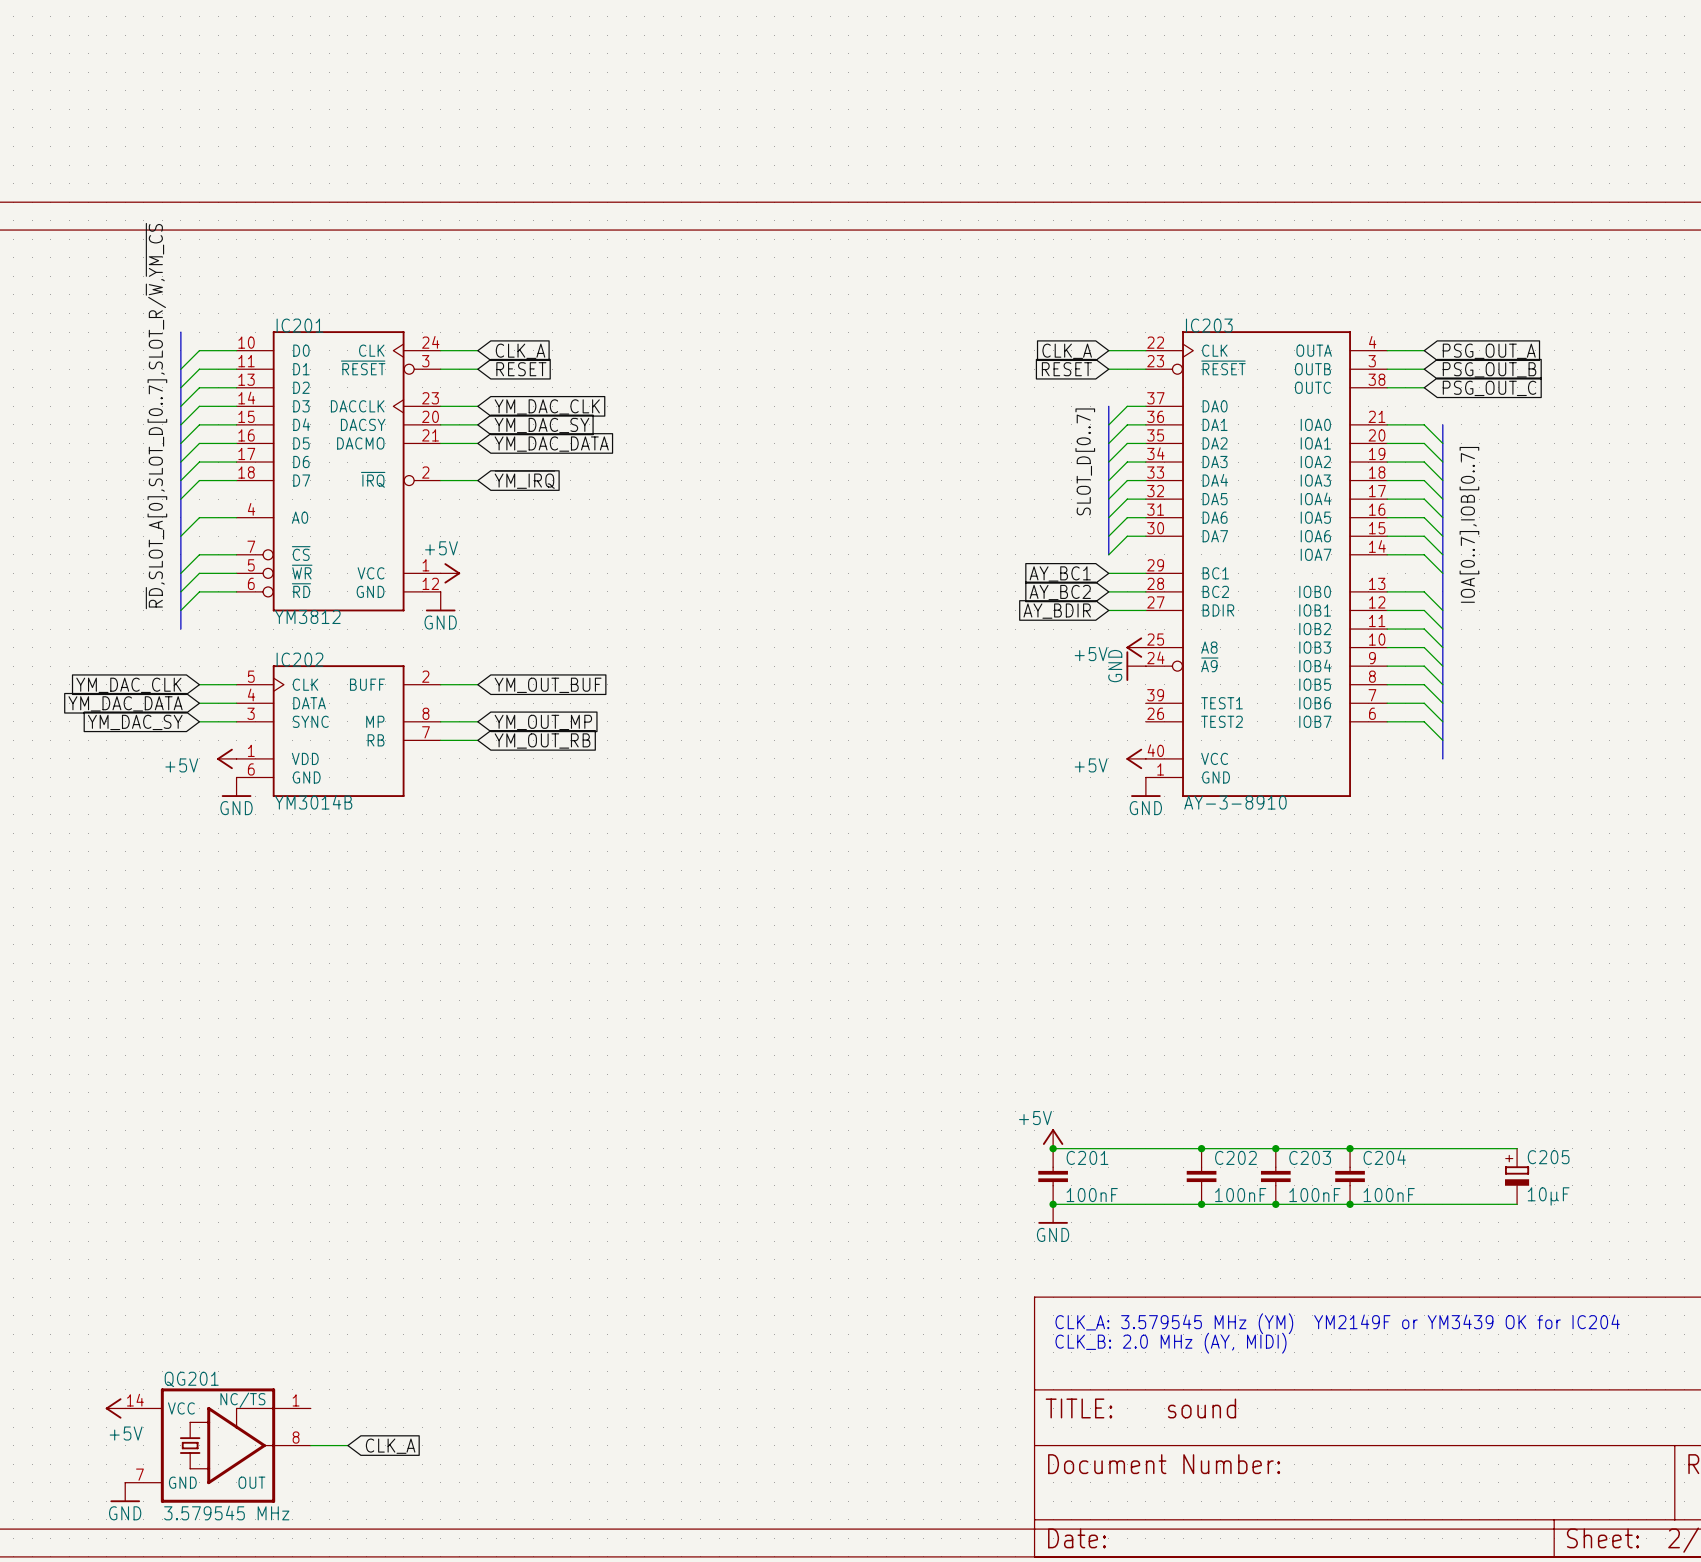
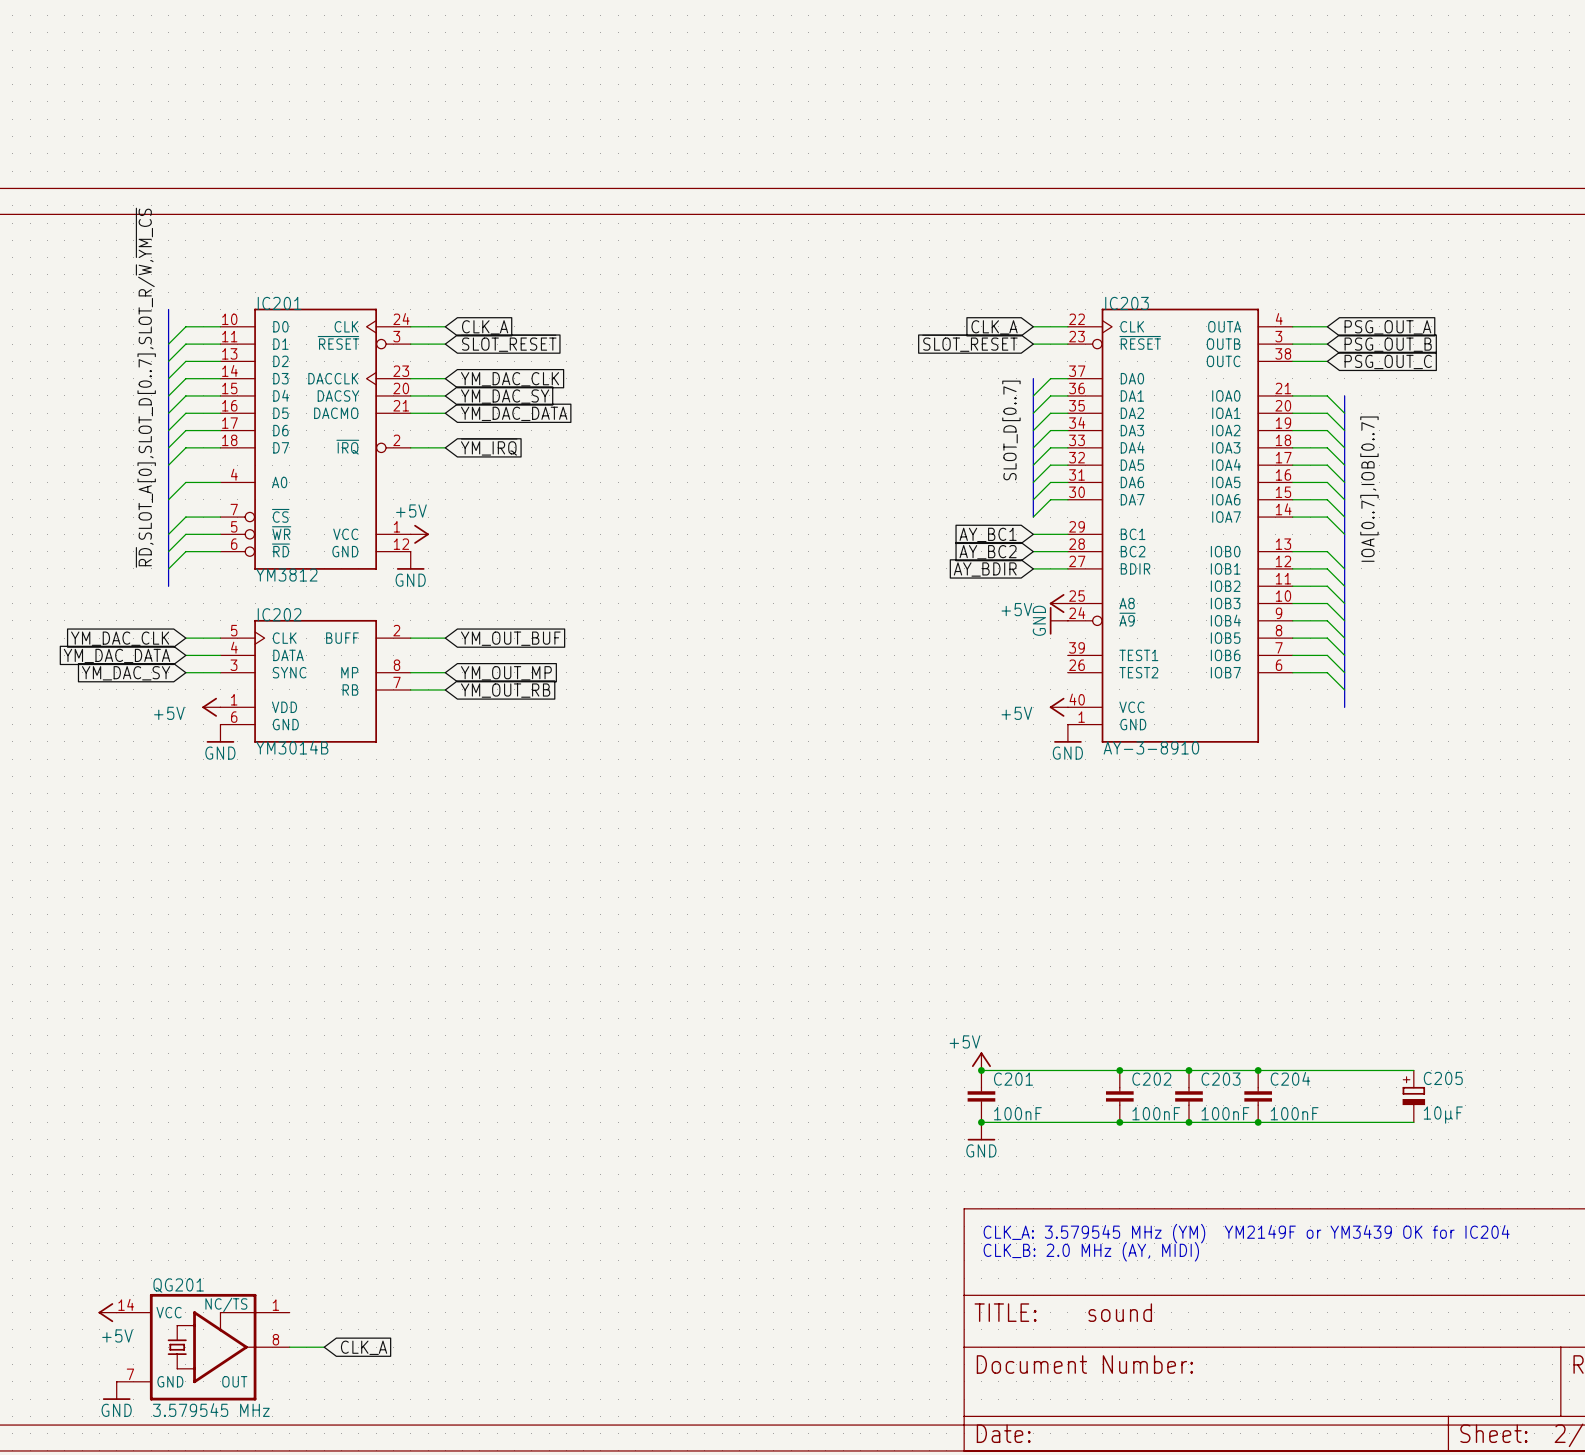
global label: ~{RESET} (520, 367) -> ~{SLOT_RESET} (508, 343)
global label: ~{RESET} (1066, 367) -> ~{SLOT_RESET} (969, 343)

